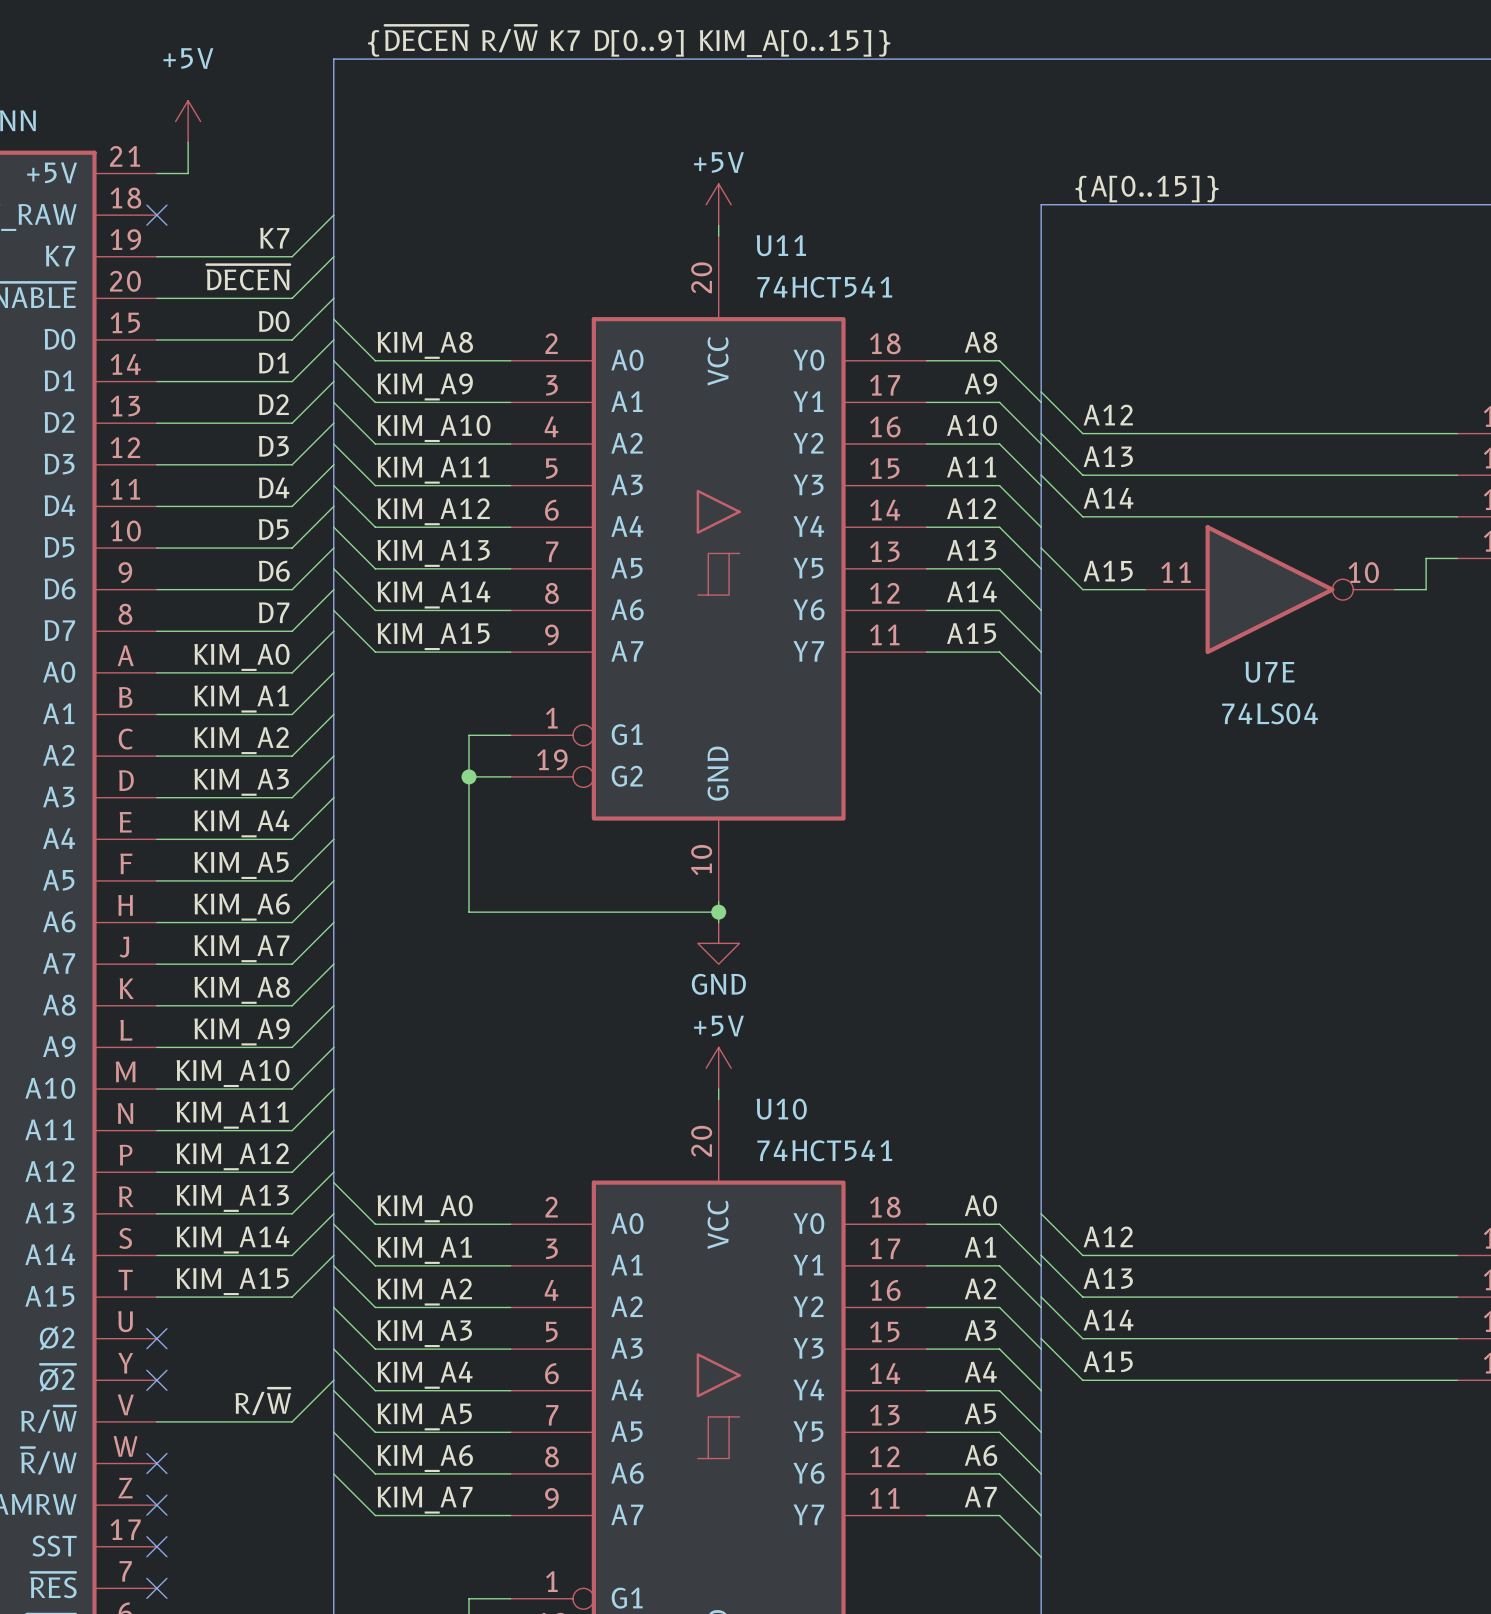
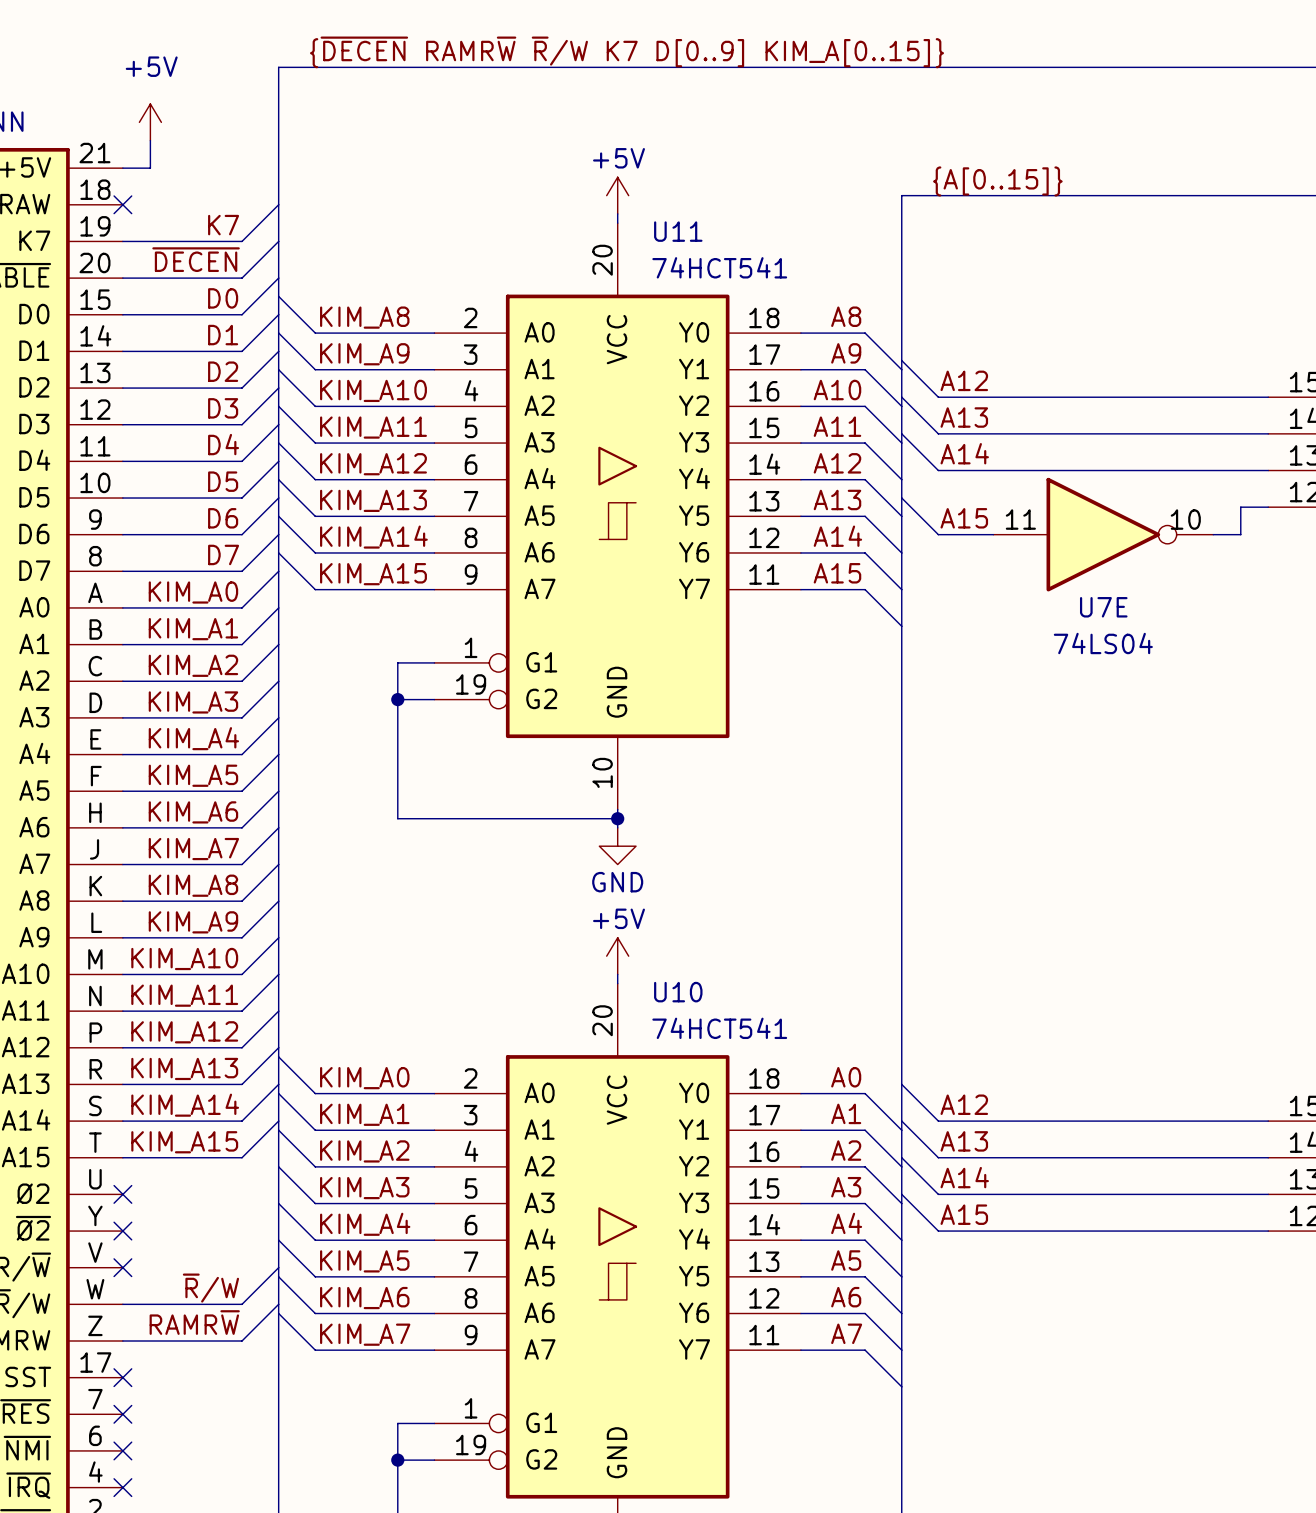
label: {~{DECEN} R/~{W} K7 D[0..9] KIM_A[0..15]} (629, 41) -> {~{DECEN} RAMR~{W} ~{R}/W K7 D[0..9] KIM_A[0..15]} (626, 52)
wire: (333, 1380) (292, 1421) (156, 1421) -> (278, 1267) (242, 1304) (122, 1304)
label: R/~{W} (263, 1401) -> none
no-connect mark: none -> (122, 1267)
label: none -> ~{R}/W (210, 1288)
no-connect mark: (156, 1463) -> none
wire: none -> (278, 1304) (242, 1341) (122, 1341)
label: none -> RAMR~{W} (194, 1322)
no-connect mark: (156, 1505) -> none

